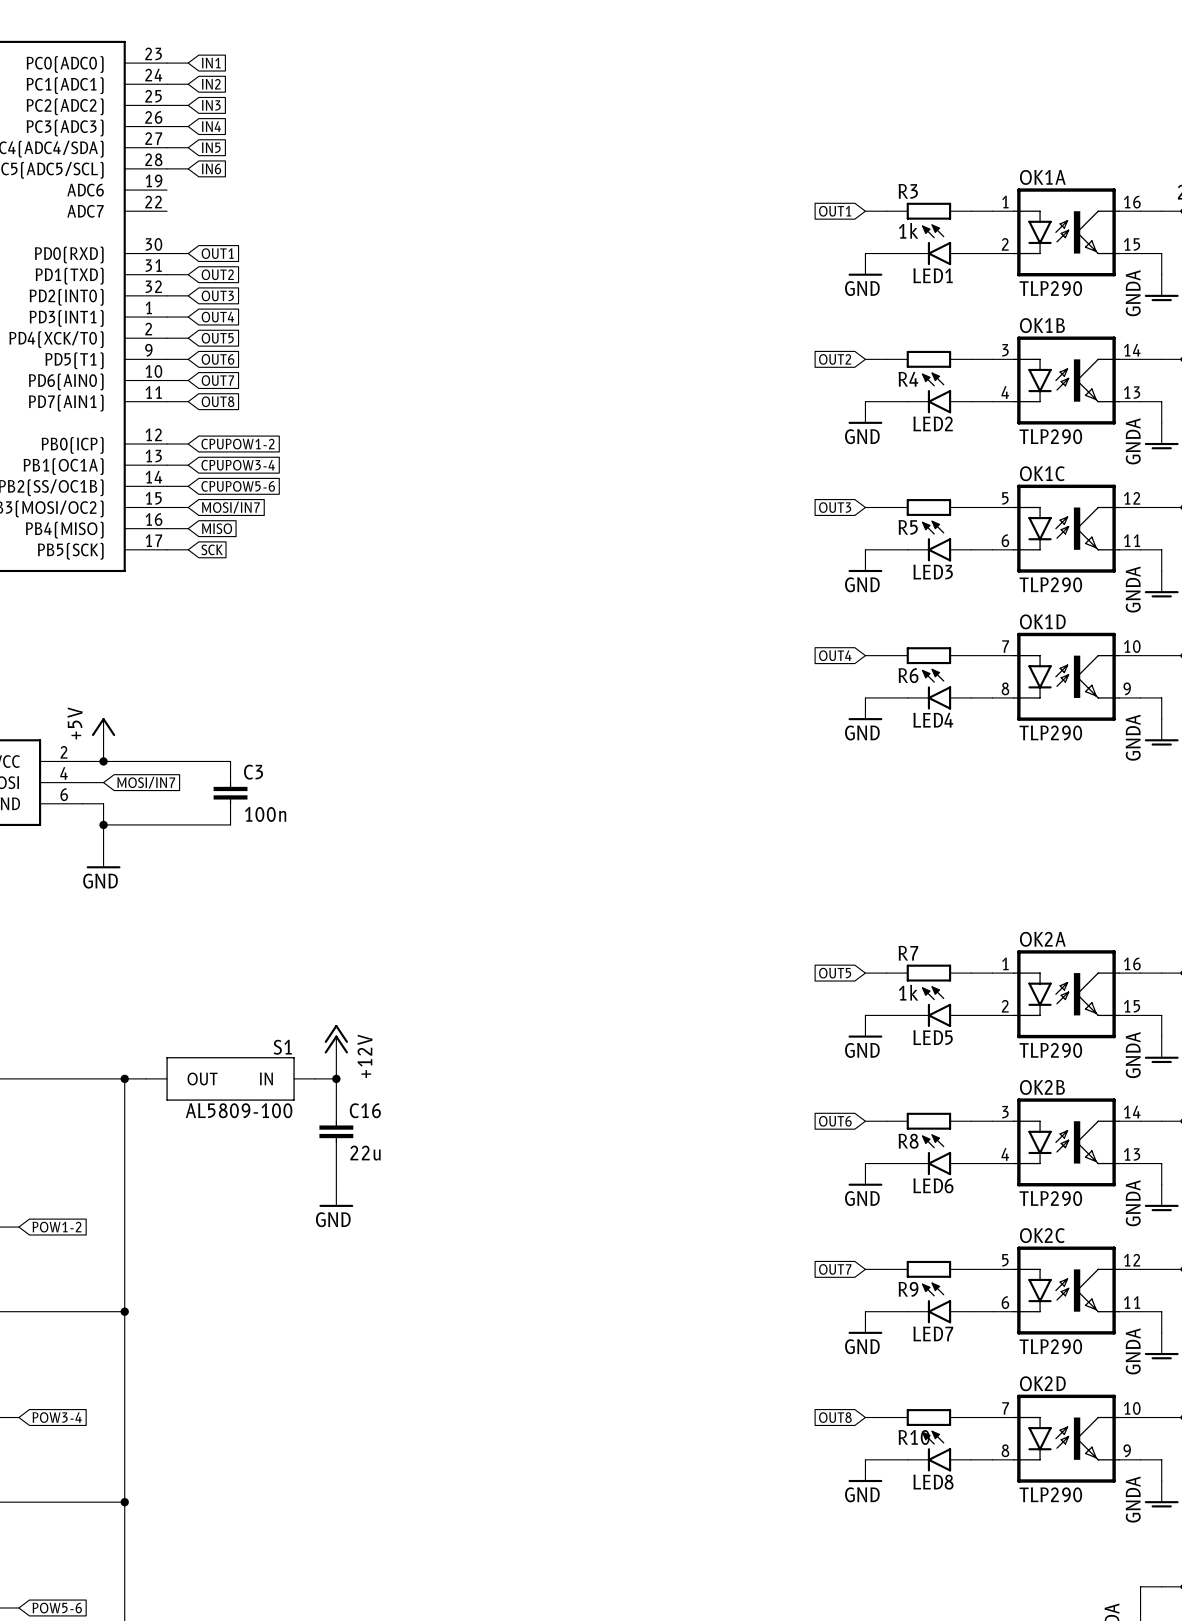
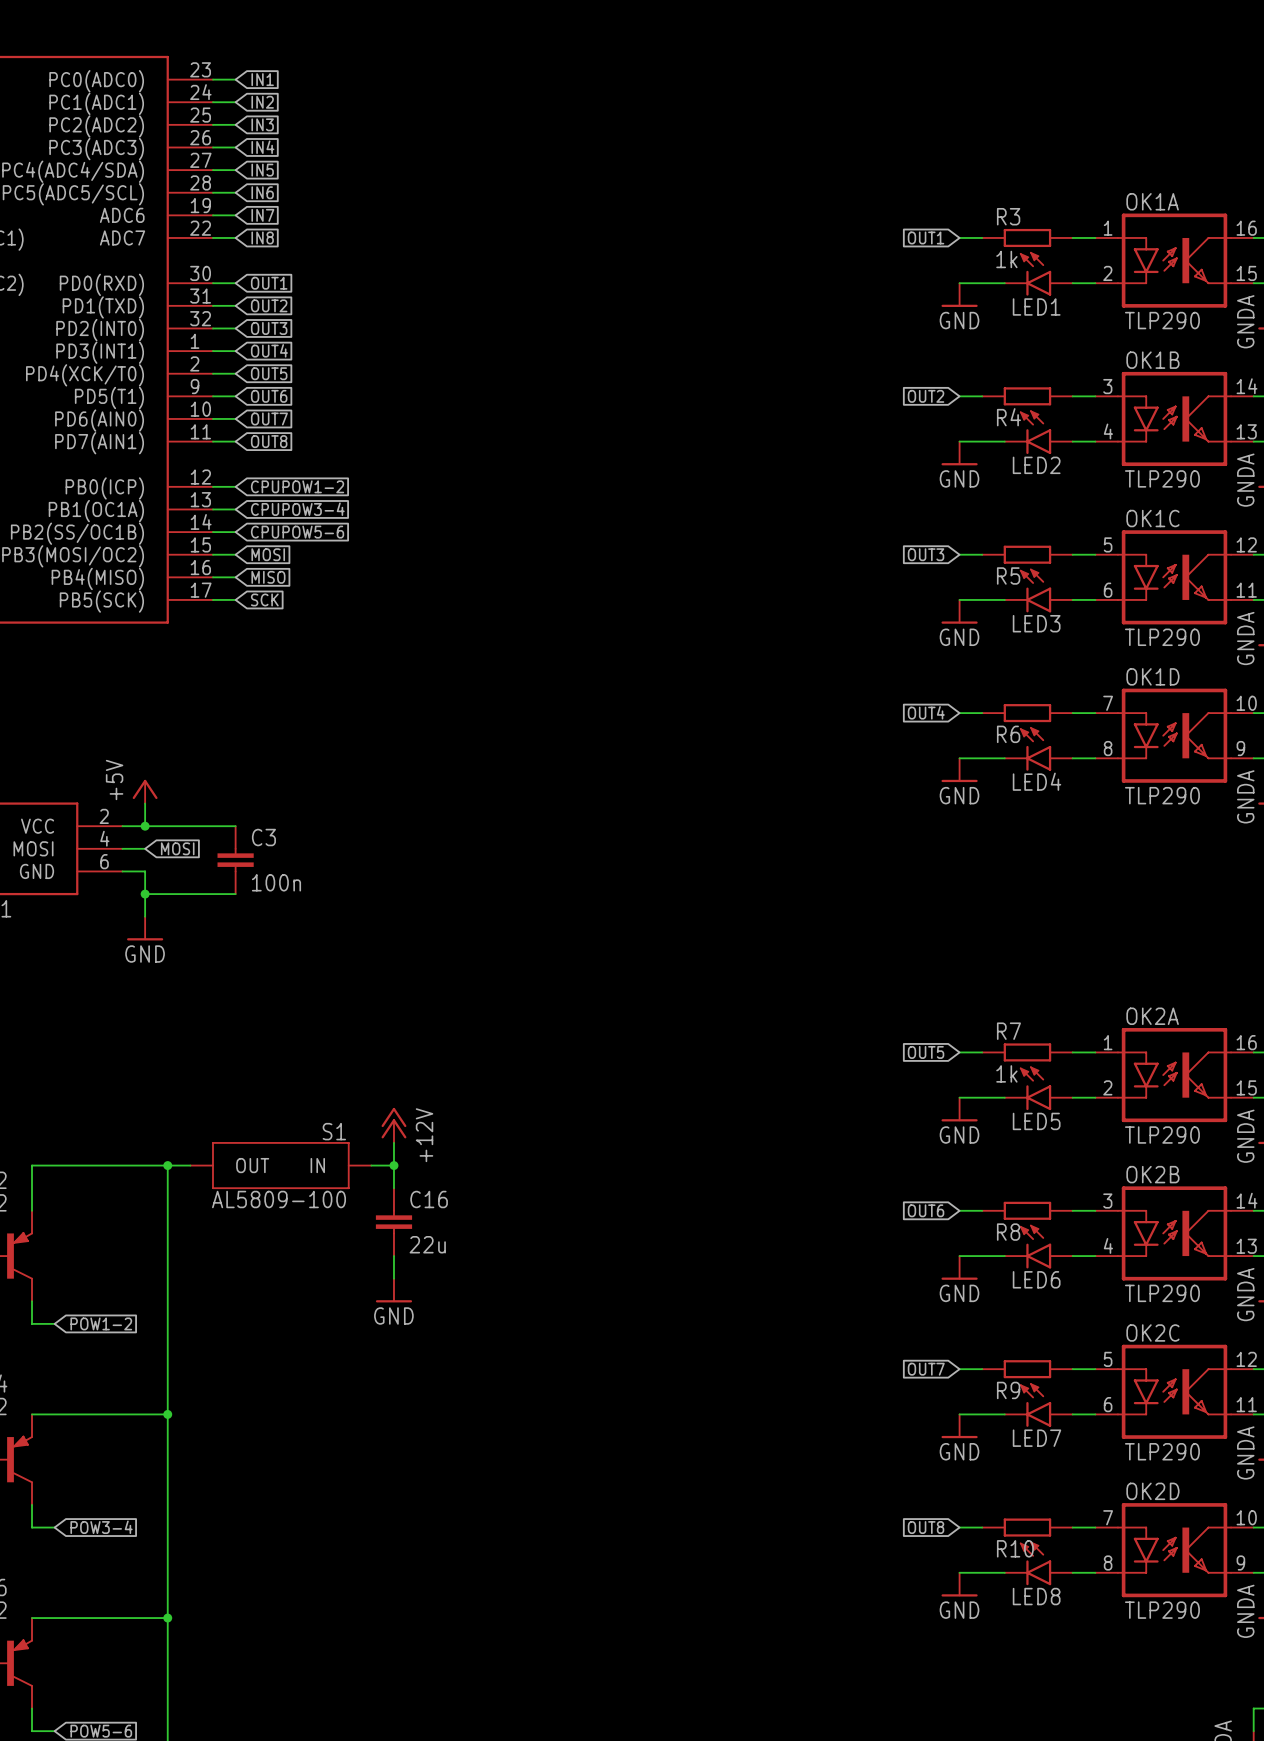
wire: none -> (212, 215) (235, 215)
global label: none -> IN7 (262, 215)
wire: none -> (212, 237) (235, 237)
global label: none -> IN8 (262, 237)
global label: MOSI/IN7 (230, 507) -> MOSI (268, 554)
wire: (188, 761) (230, 761) -> none
global label: MOSI/IN7 (146, 782) -> MOSI (177, 848)
C3 position: (230, 793) -> (235, 860)
wire: (188, 824) (230, 824) -> none

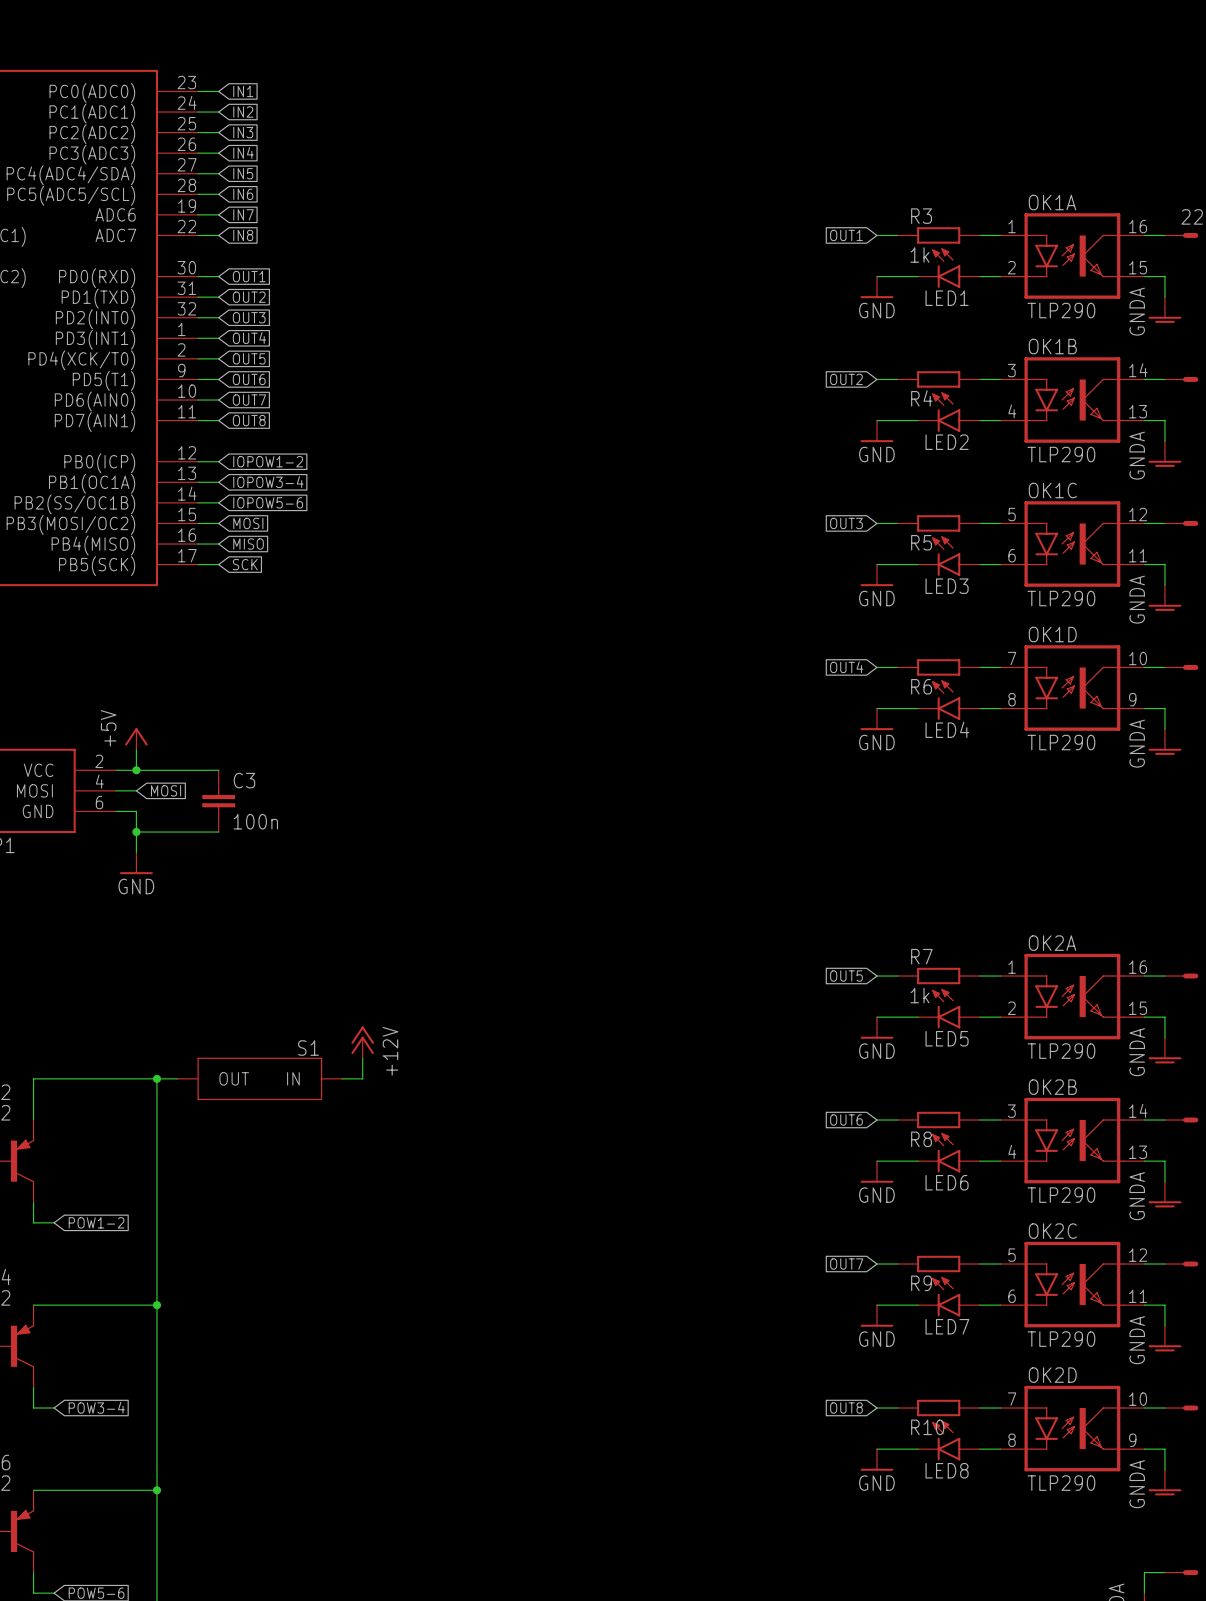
global label: CPUPOW1-2 (297, 486) -> IOPOW1-2 (268, 461)
global label: CPUPOW3-4 (297, 509) -> IOPOW3-4 (268, 482)
global label: CPUPOW5-6 (297, 532) -> IOPOW5-6 (268, 502)
wire: (393, 1165) (393, 1188) -> none
junction: (393, 1165) -> none
S1 value: AL5809-100 (279, 1199) -> none
C16: 22u (393, 1222) -> none
wire: (393, 1256) (393, 1278) -> none
power symbol: GND (393, 1290) -> none

